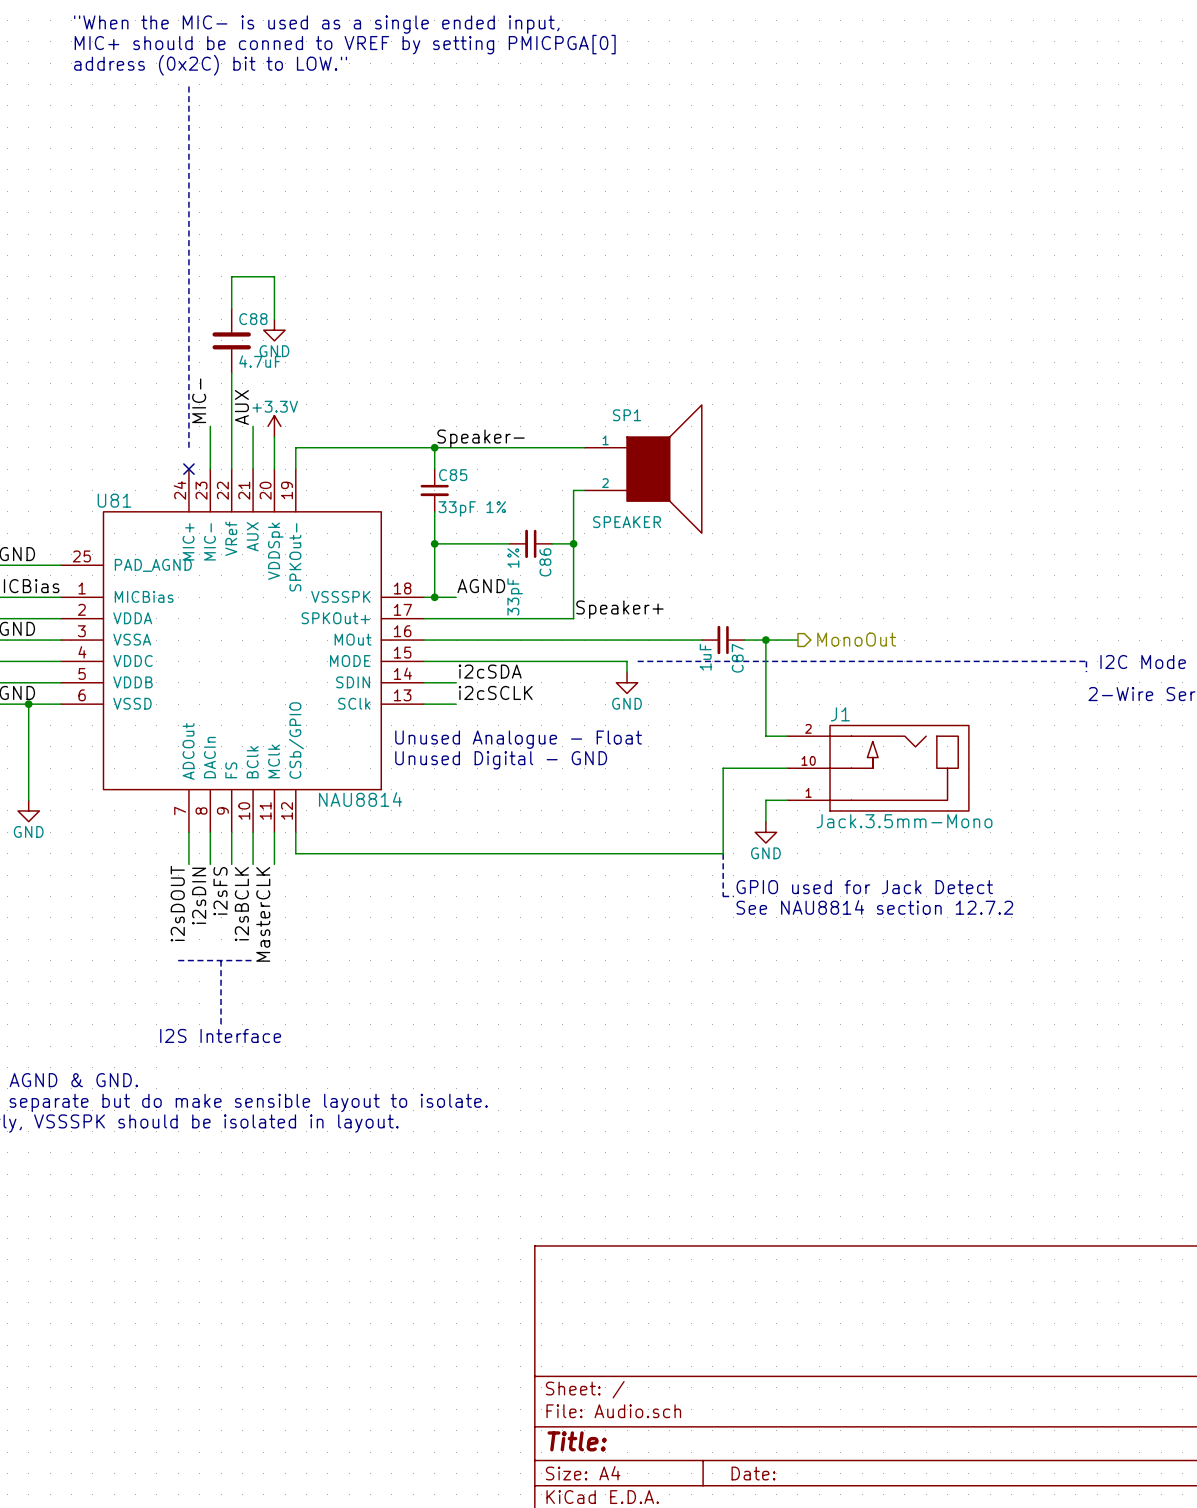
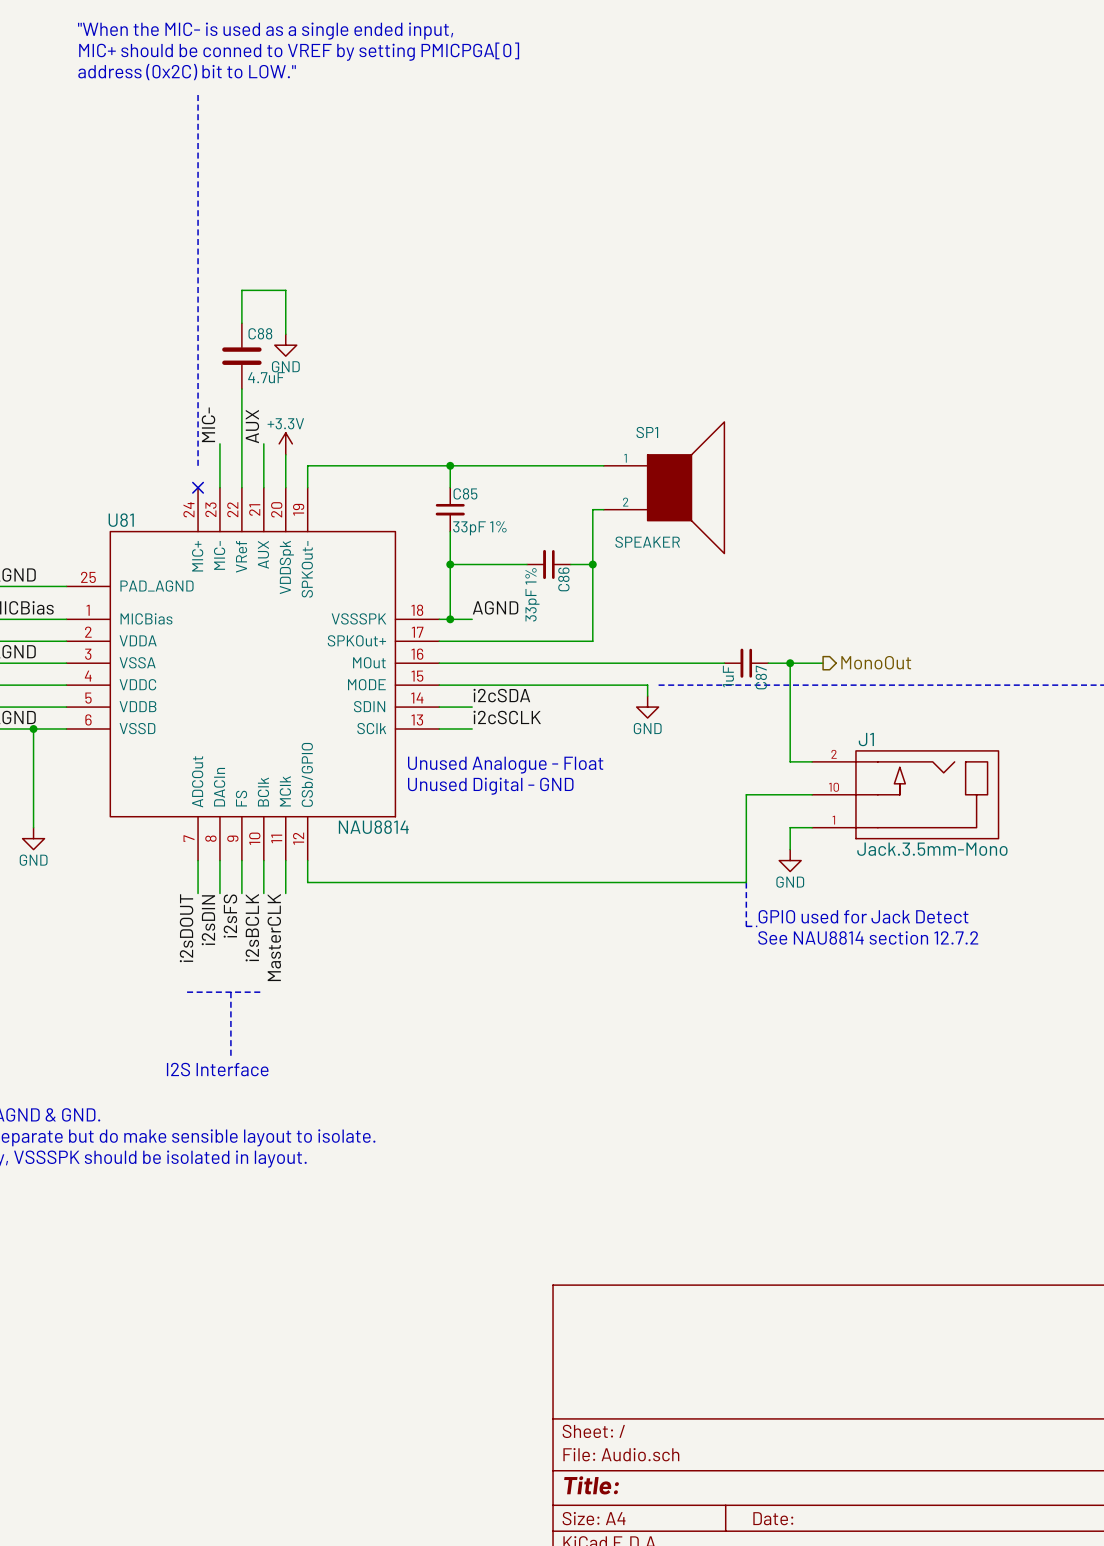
label: Speaker- (481, 438) -> none
label: Speaker+ (619, 609) -> none

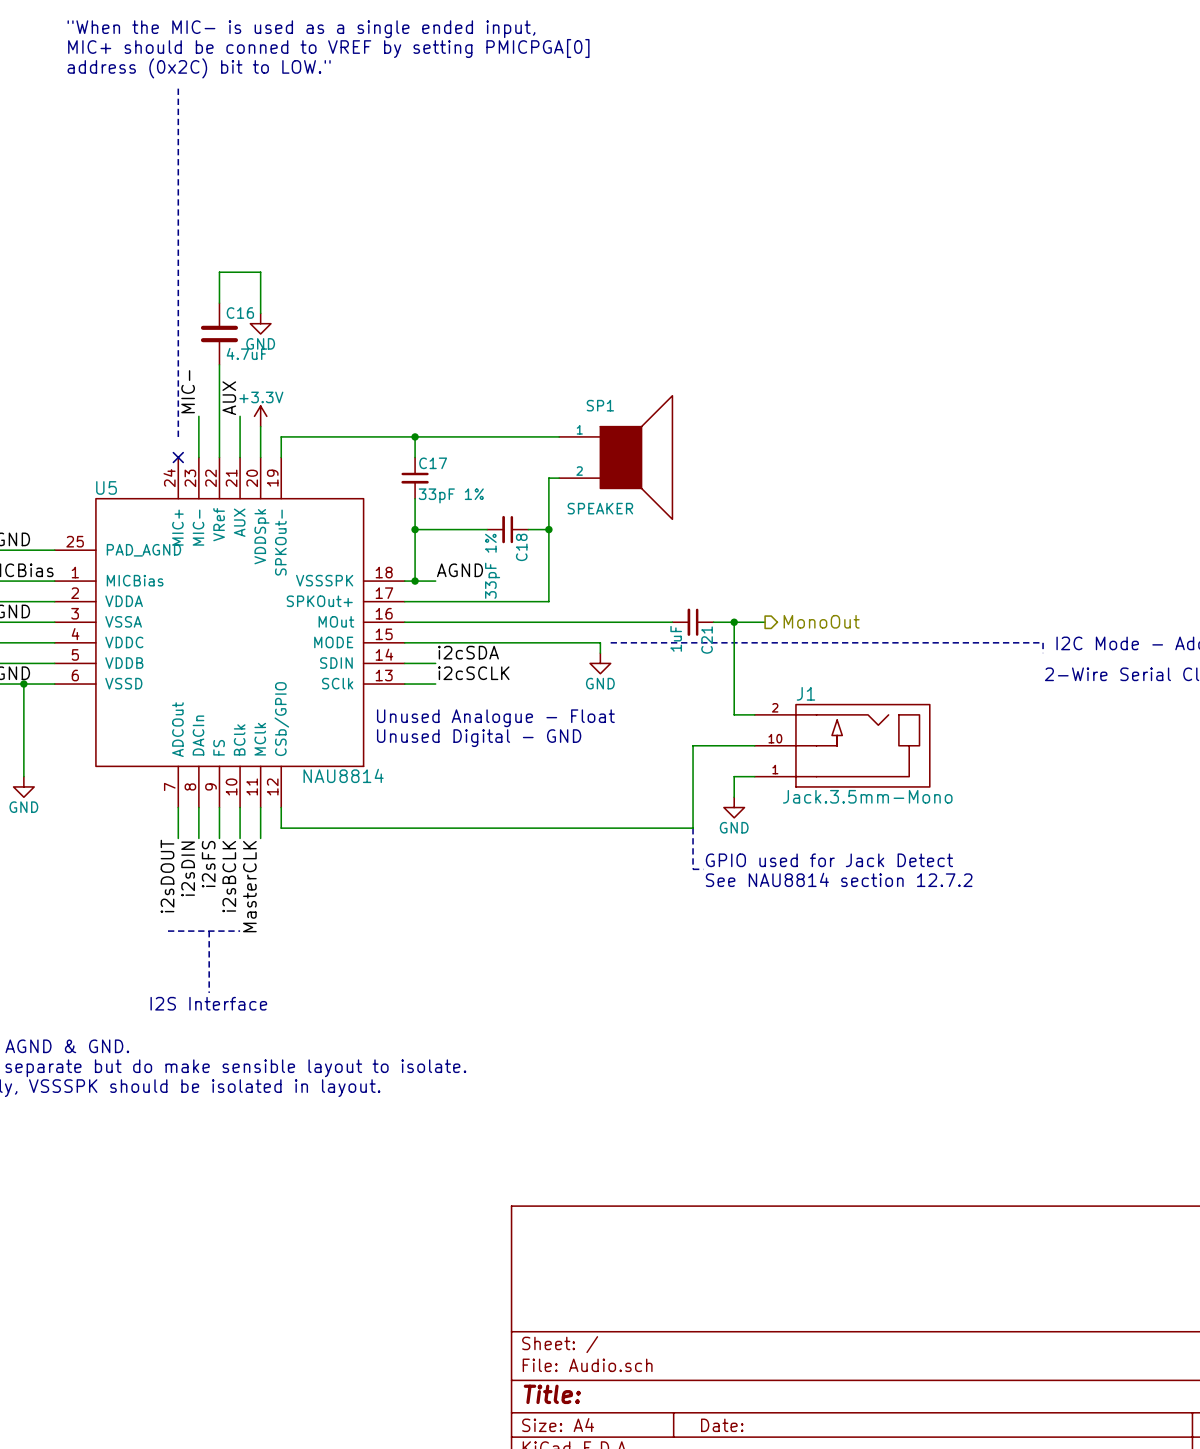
C88 name: C88 (260, 333) -> C16 (240, 313)
C85 name: C85 (465, 493) -> C17 (433, 463)
U81 name: U81 (121, 520) -> U5 (106, 487)
C86 name: C86 (563, 579) -> C18 (521, 547)
C87 name: C87 (761, 677) -> C21 (707, 640)

